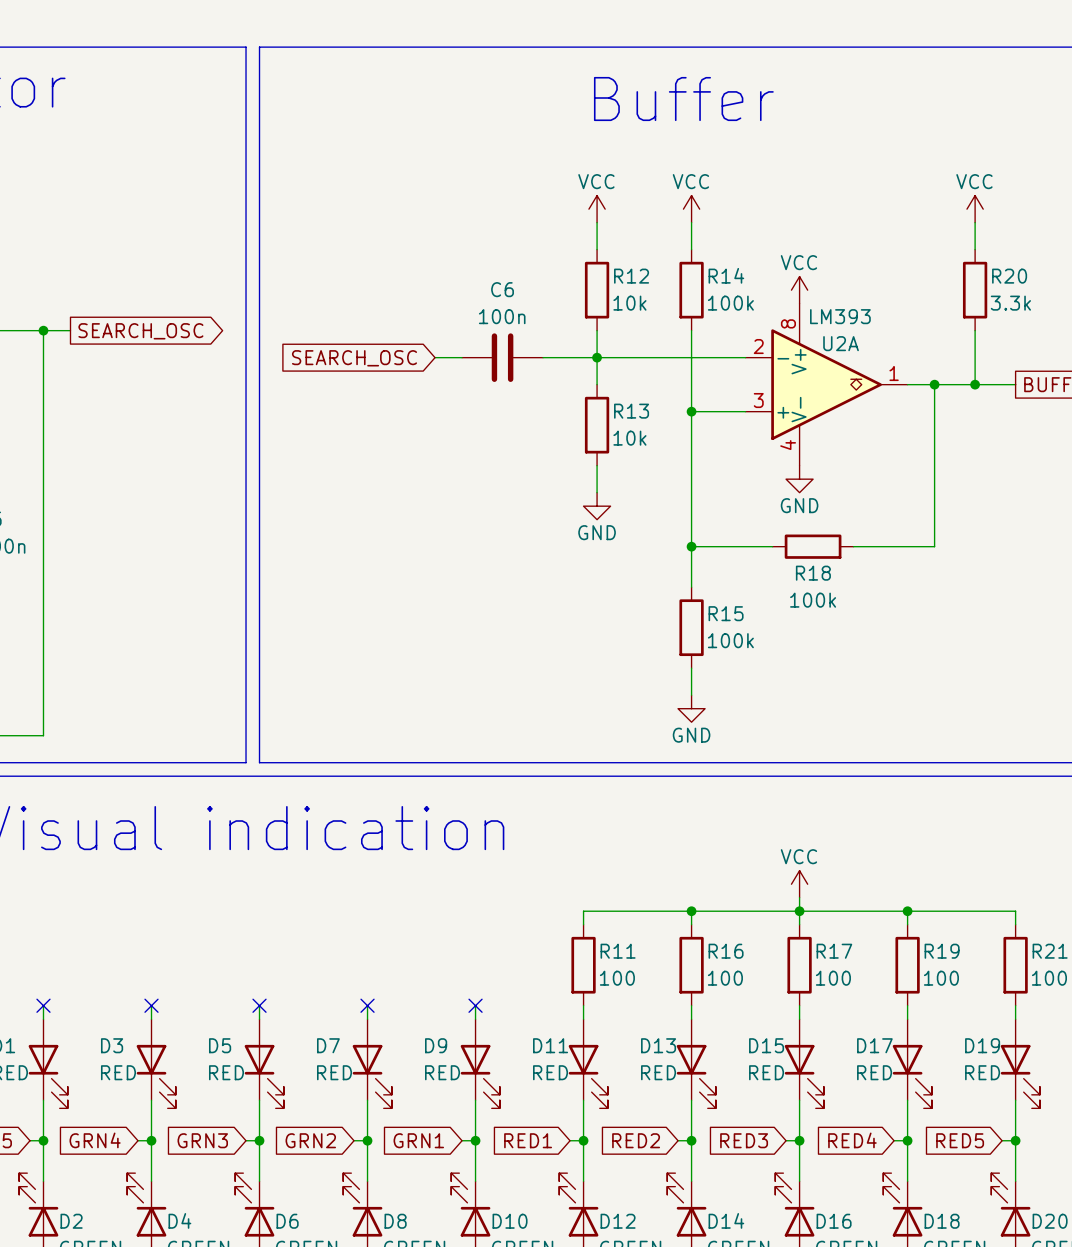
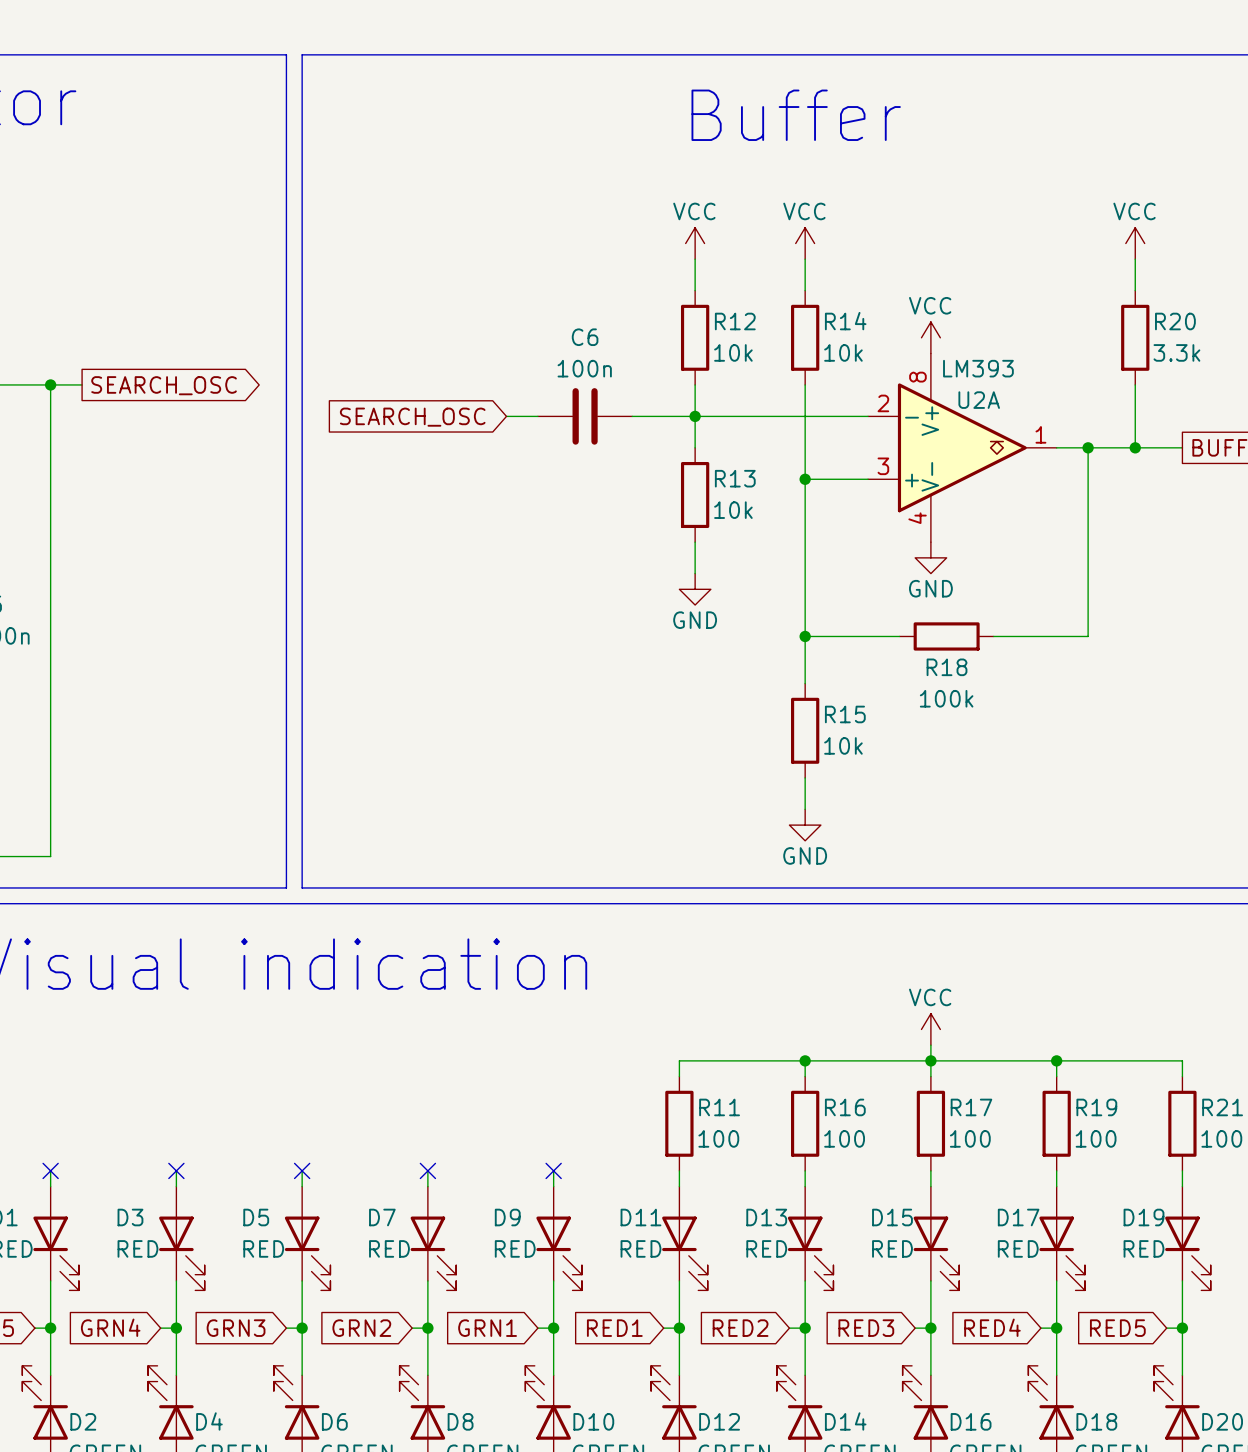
R14 value: 100k (730, 303) -> 10k (843, 352)
R15 value: 100k (730, 640) -> 10k (843, 745)

